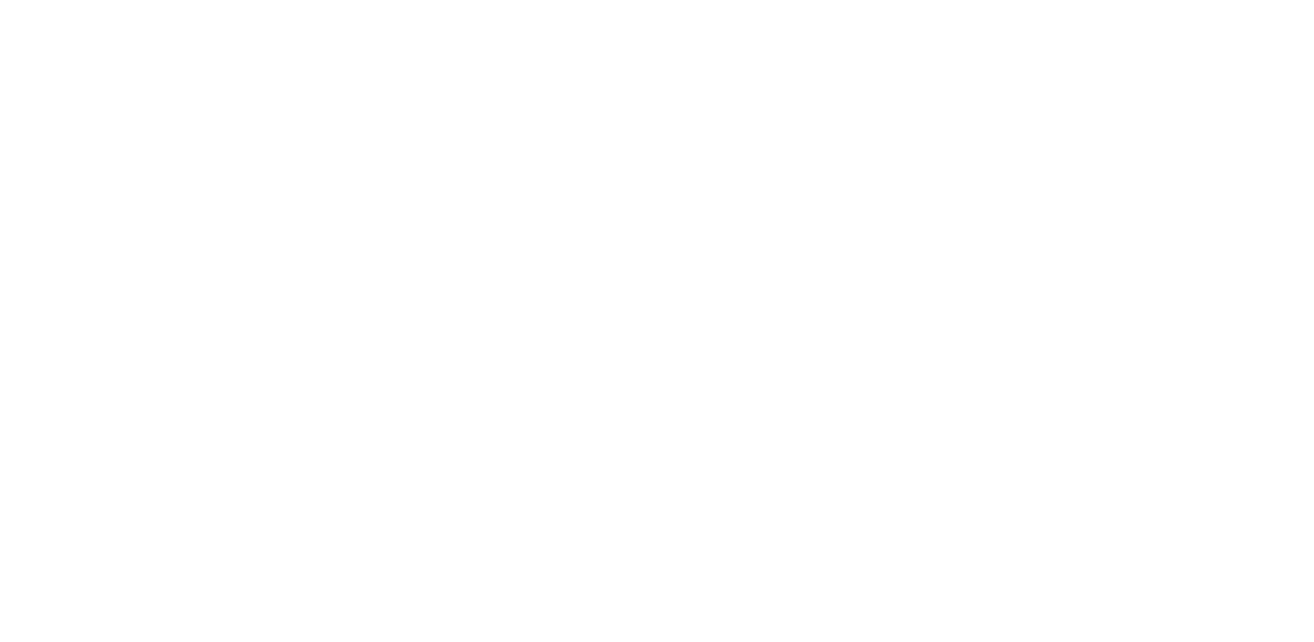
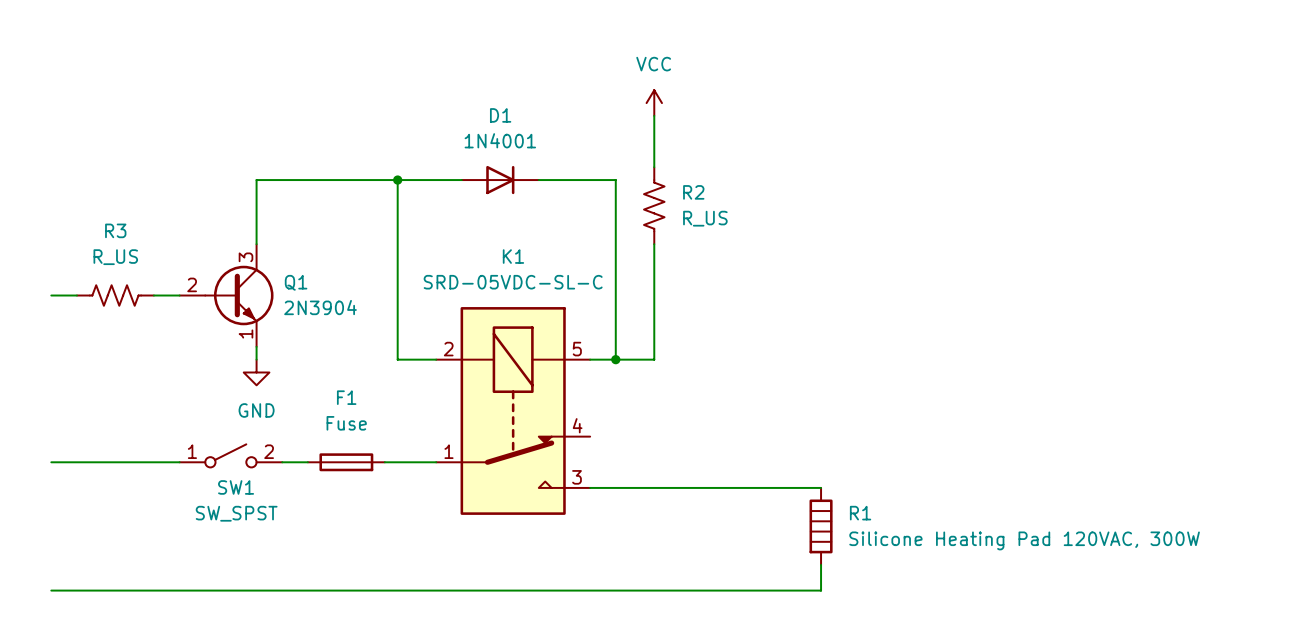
power symbol: none -> VCC (654, 103)
wire: none -> (654, 115) (654, 167)
wire: none -> (397, 180) (397, 359) (436, 359)
junction: none -> (397, 180)
wire: none -> (461, 180) (256, 180) (256, 244)
D1: none -> 1N4001 (500, 180)
wire: none -> (538, 180) (615, 180) (615, 359)
R2: none -> R_US (654, 205)
wire: none -> (654, 244) (654, 359) (590, 359)
wire: none -> (51, 295) (76, 295)
R3: none -> R_US (115, 295)
wire: none -> (153, 295) (179, 295)
Q1: none -> 2N3904 (226, 295)
wire: none -> (256, 346) (256, 359)
junction: none -> (615, 359)
power symbol: none -> GND (256, 372)
K1: none -> SRD-05VDC-SL-C (513, 410)
SW1: none -> SW_SPST (230, 455)
wire: none -> (51, 462) (179, 462)
wire: none -> (282, 462) (307, 462)
F1: none -> Fuse (346, 462)
wire: none -> (384, 462) (436, 462)
wire: none -> (590, 487) (821, 487)
R1: none -> Silicone Heating Pad 120VAC, 300W (821, 526)
wire: none -> (821, 564) (821, 590) (51, 590)

